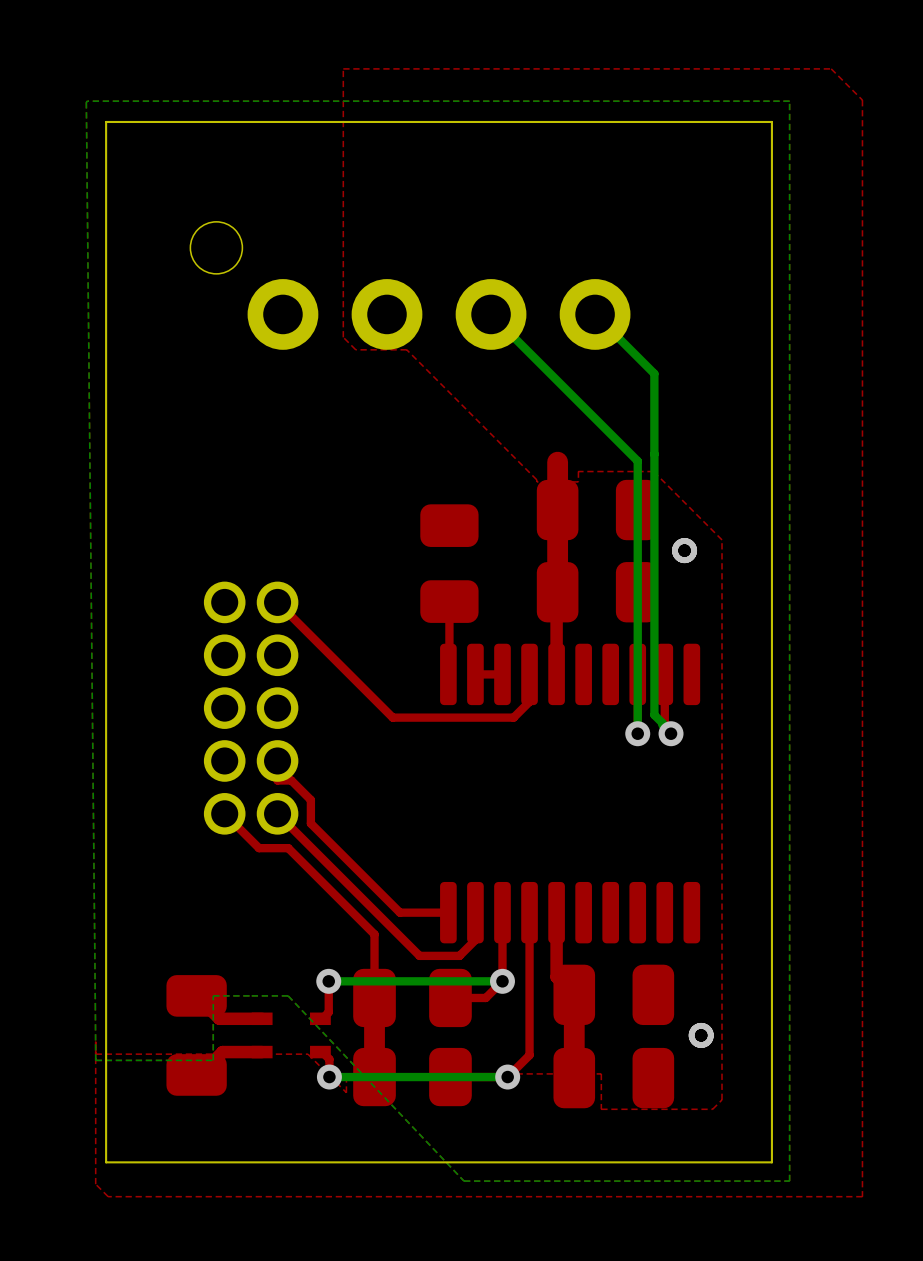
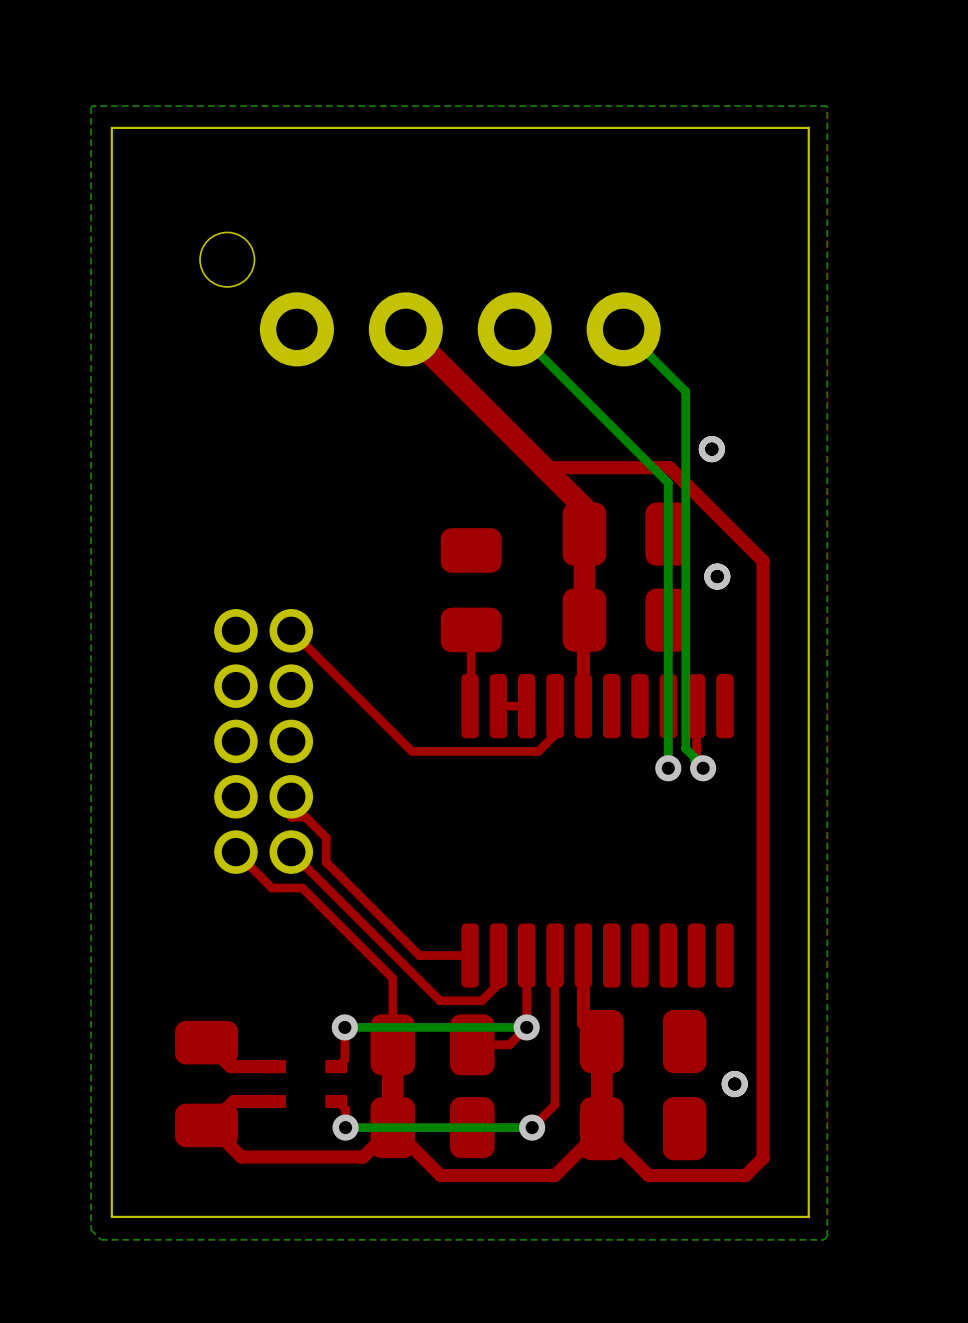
bottom zone outline: (86, 102) (95, 1060) (213, 1060) (213, 995) (288, 995) (463, 1181) (789, 1181) -> (91, 107) (91, 1229) (100, 1239) (824, 1239) (827, 1236)
via: none -> (711, 449)
top track: none -> (544, 467) (669, 467) (763, 561) (763, 1158) (745, 1175) (648, 1175) (601, 1128) (555, 1175) (440, 1175) (392, 1127) (363, 1157) (241, 1157) (209, 1125)
top track: (557, 462) (557, 485) -> (405, 329) (584, 507)
top zone outline: (95, 1041) (95, 1184) (108, 1196) (862, 1196) (862, 100) (831, 68) (343, 68) (343, 337) (355, 349) (406, 349) (536, 481) (578, 481) (578, 471) (653, 471) (722, 539) (722, 1099) (712, 1109) (601, 1109) (601, 1073) (346, 1073) (346, 1092) (307, 1054) (95, 1054) -> none

